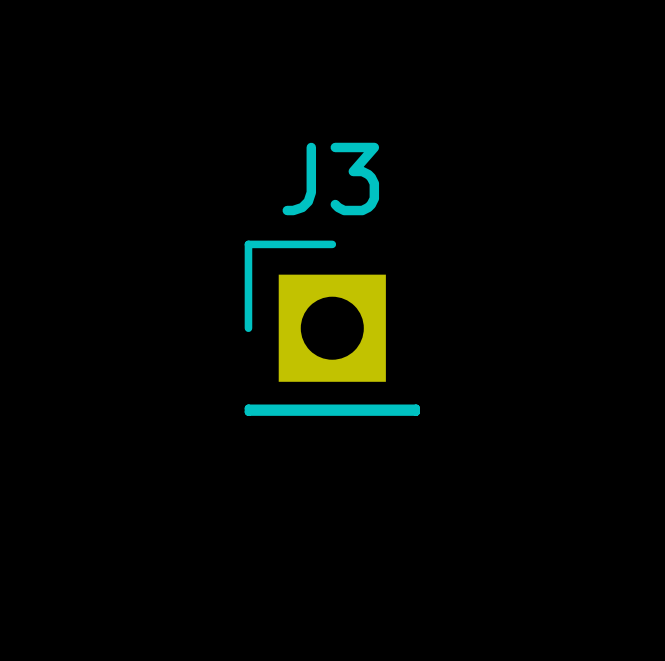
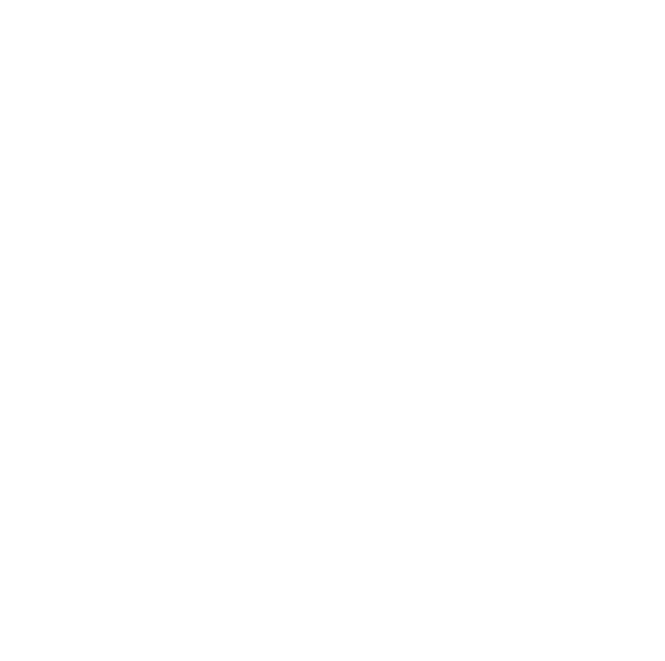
J3: (332, 328) -> none

